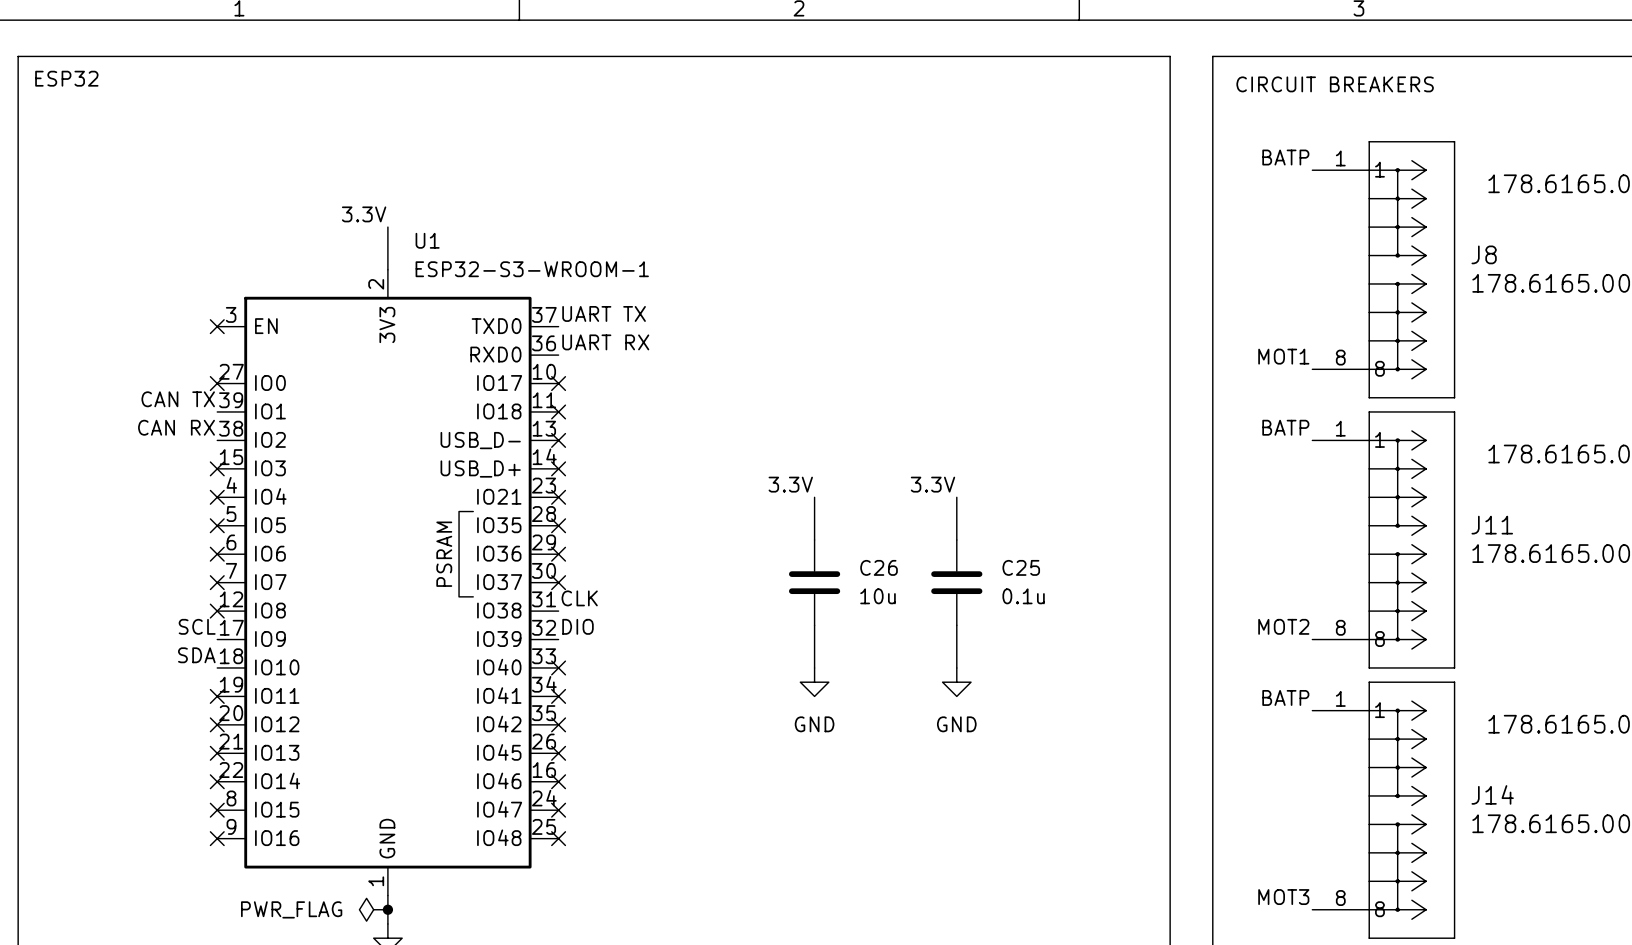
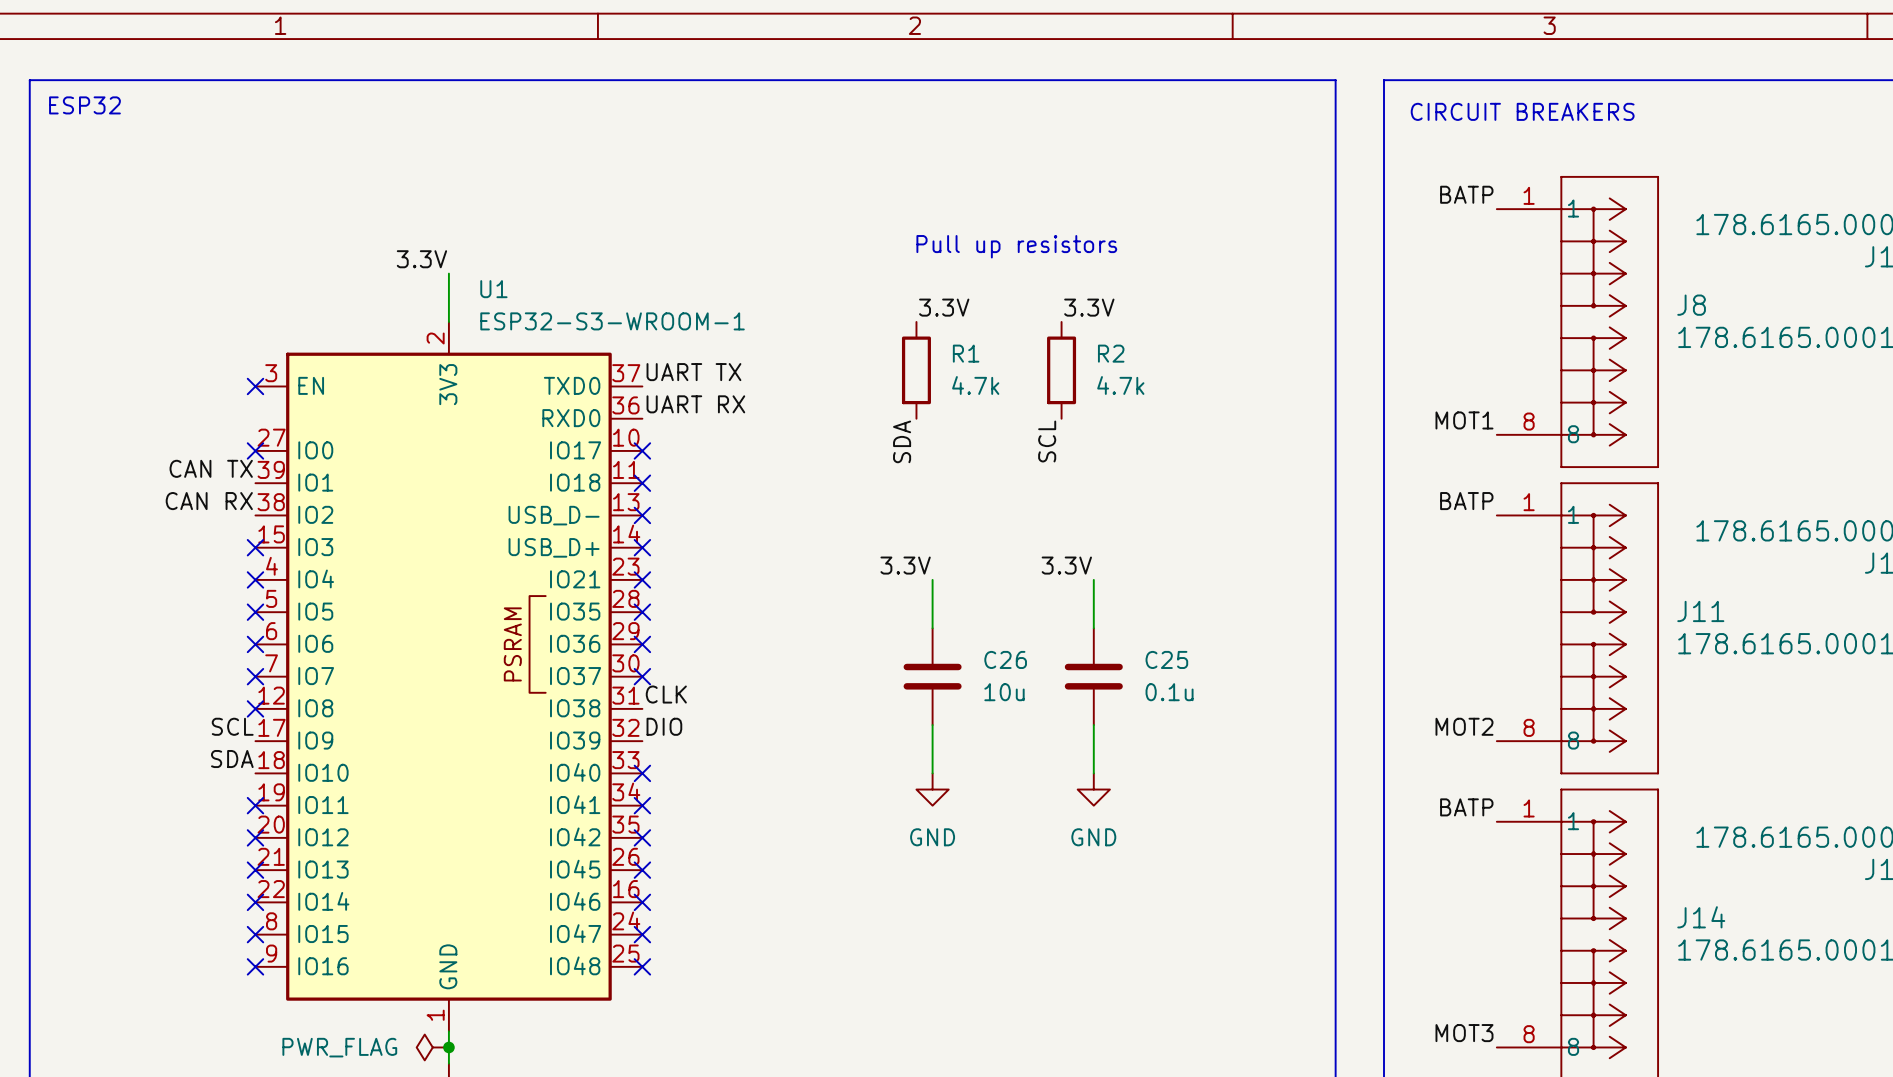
text: none -> Pull up resistors (1016, 246)
label: none -> 3.3V (944, 307)
label: none -> 3.3V (1089, 307)
R1: none -> 4.7k (916, 370)
R2: none -> 4.7k (1061, 370)
label: none -> SDA (902, 441)
label: none -> SCL (1047, 441)

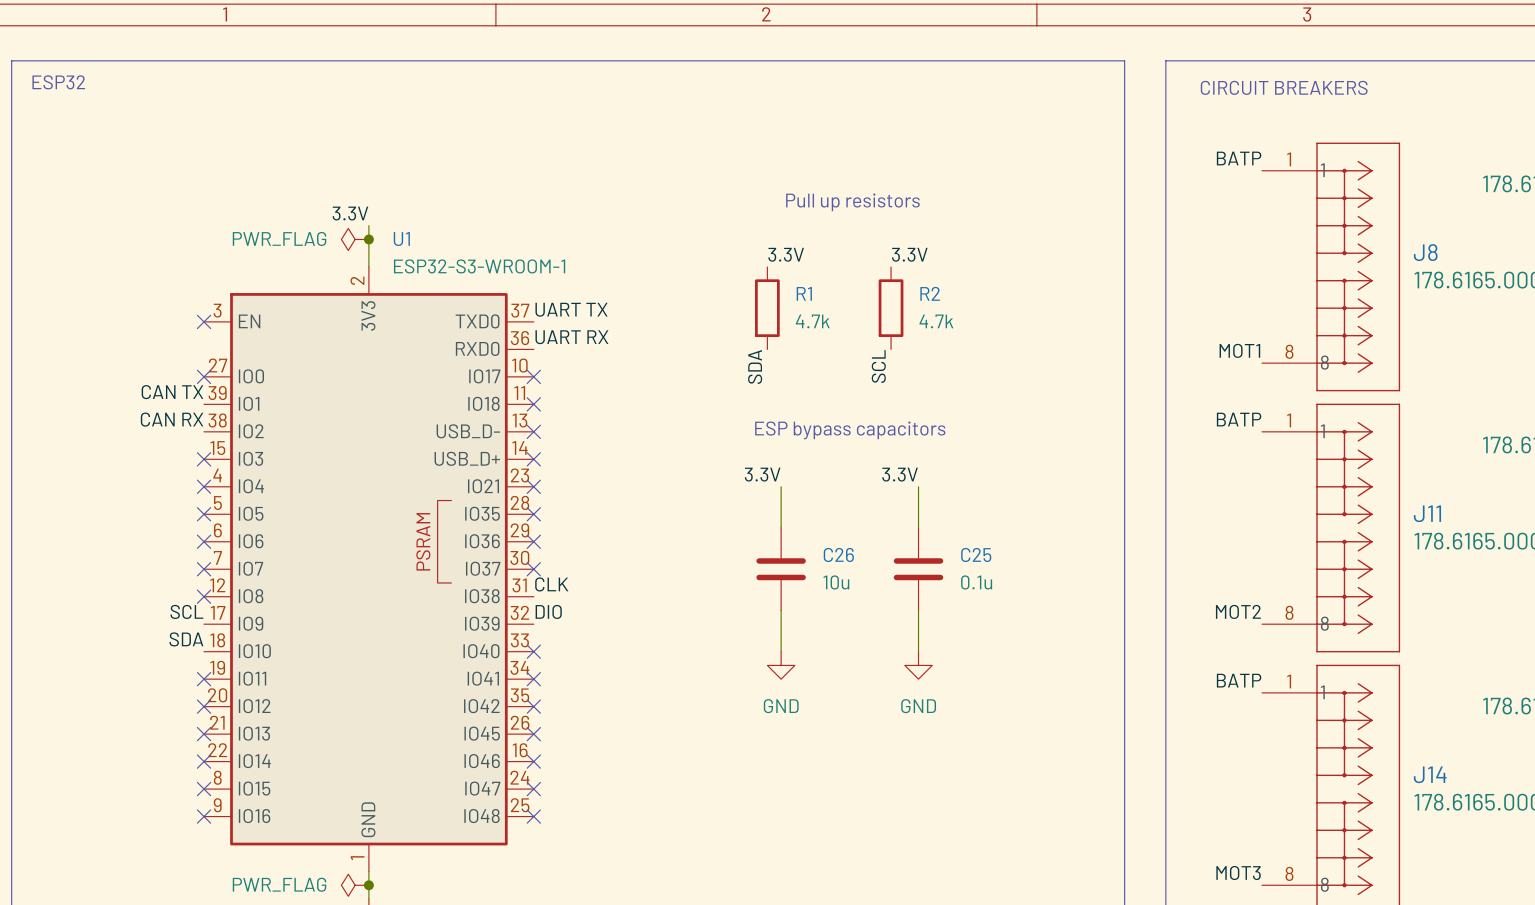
power symbol: none -> PWR_FLAG (355, 239)
junction: none -> (368, 239)
text: none -> ESP bypass capacitors (850, 430)

